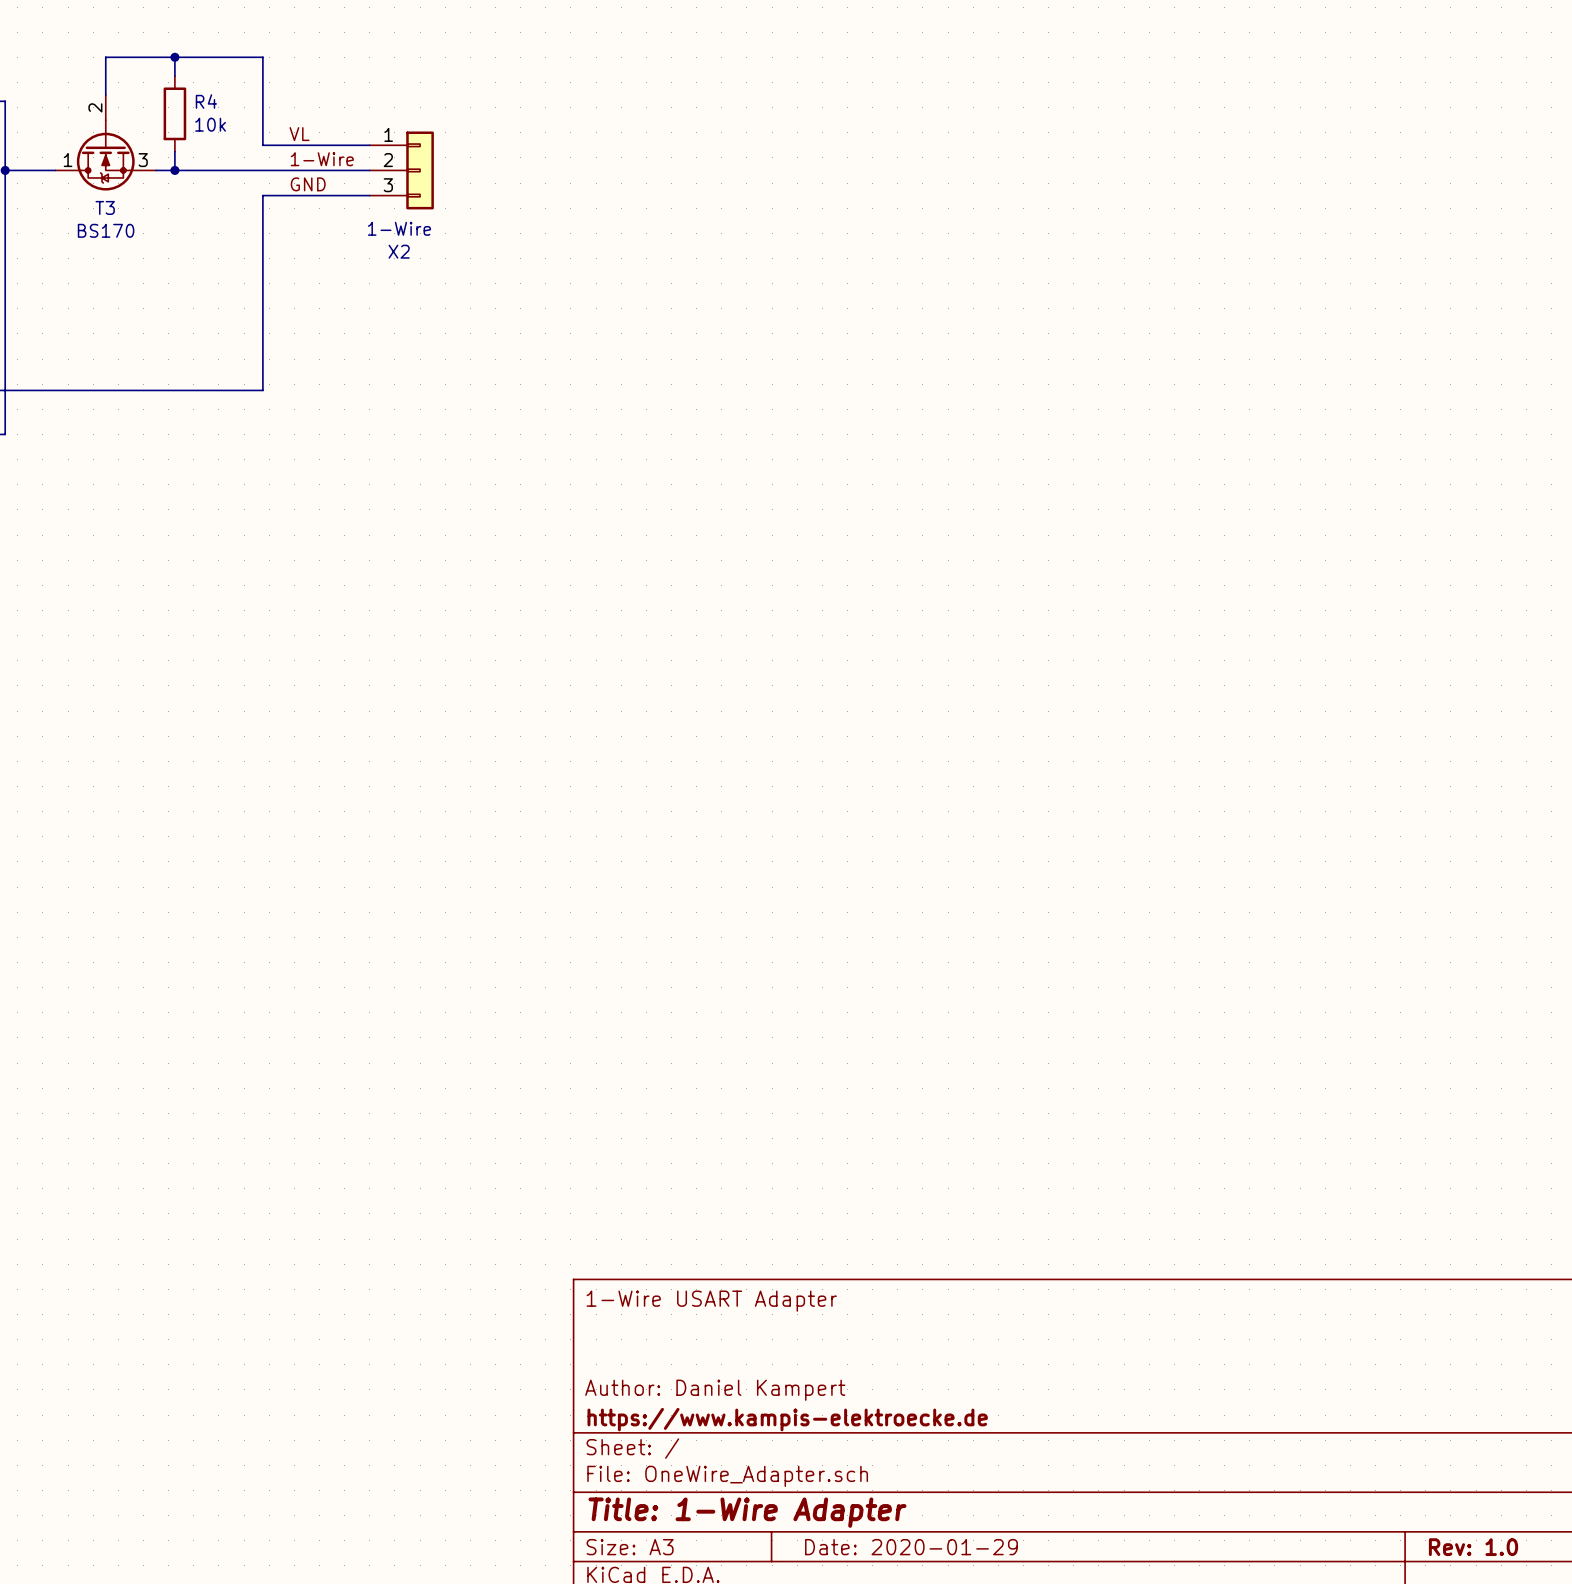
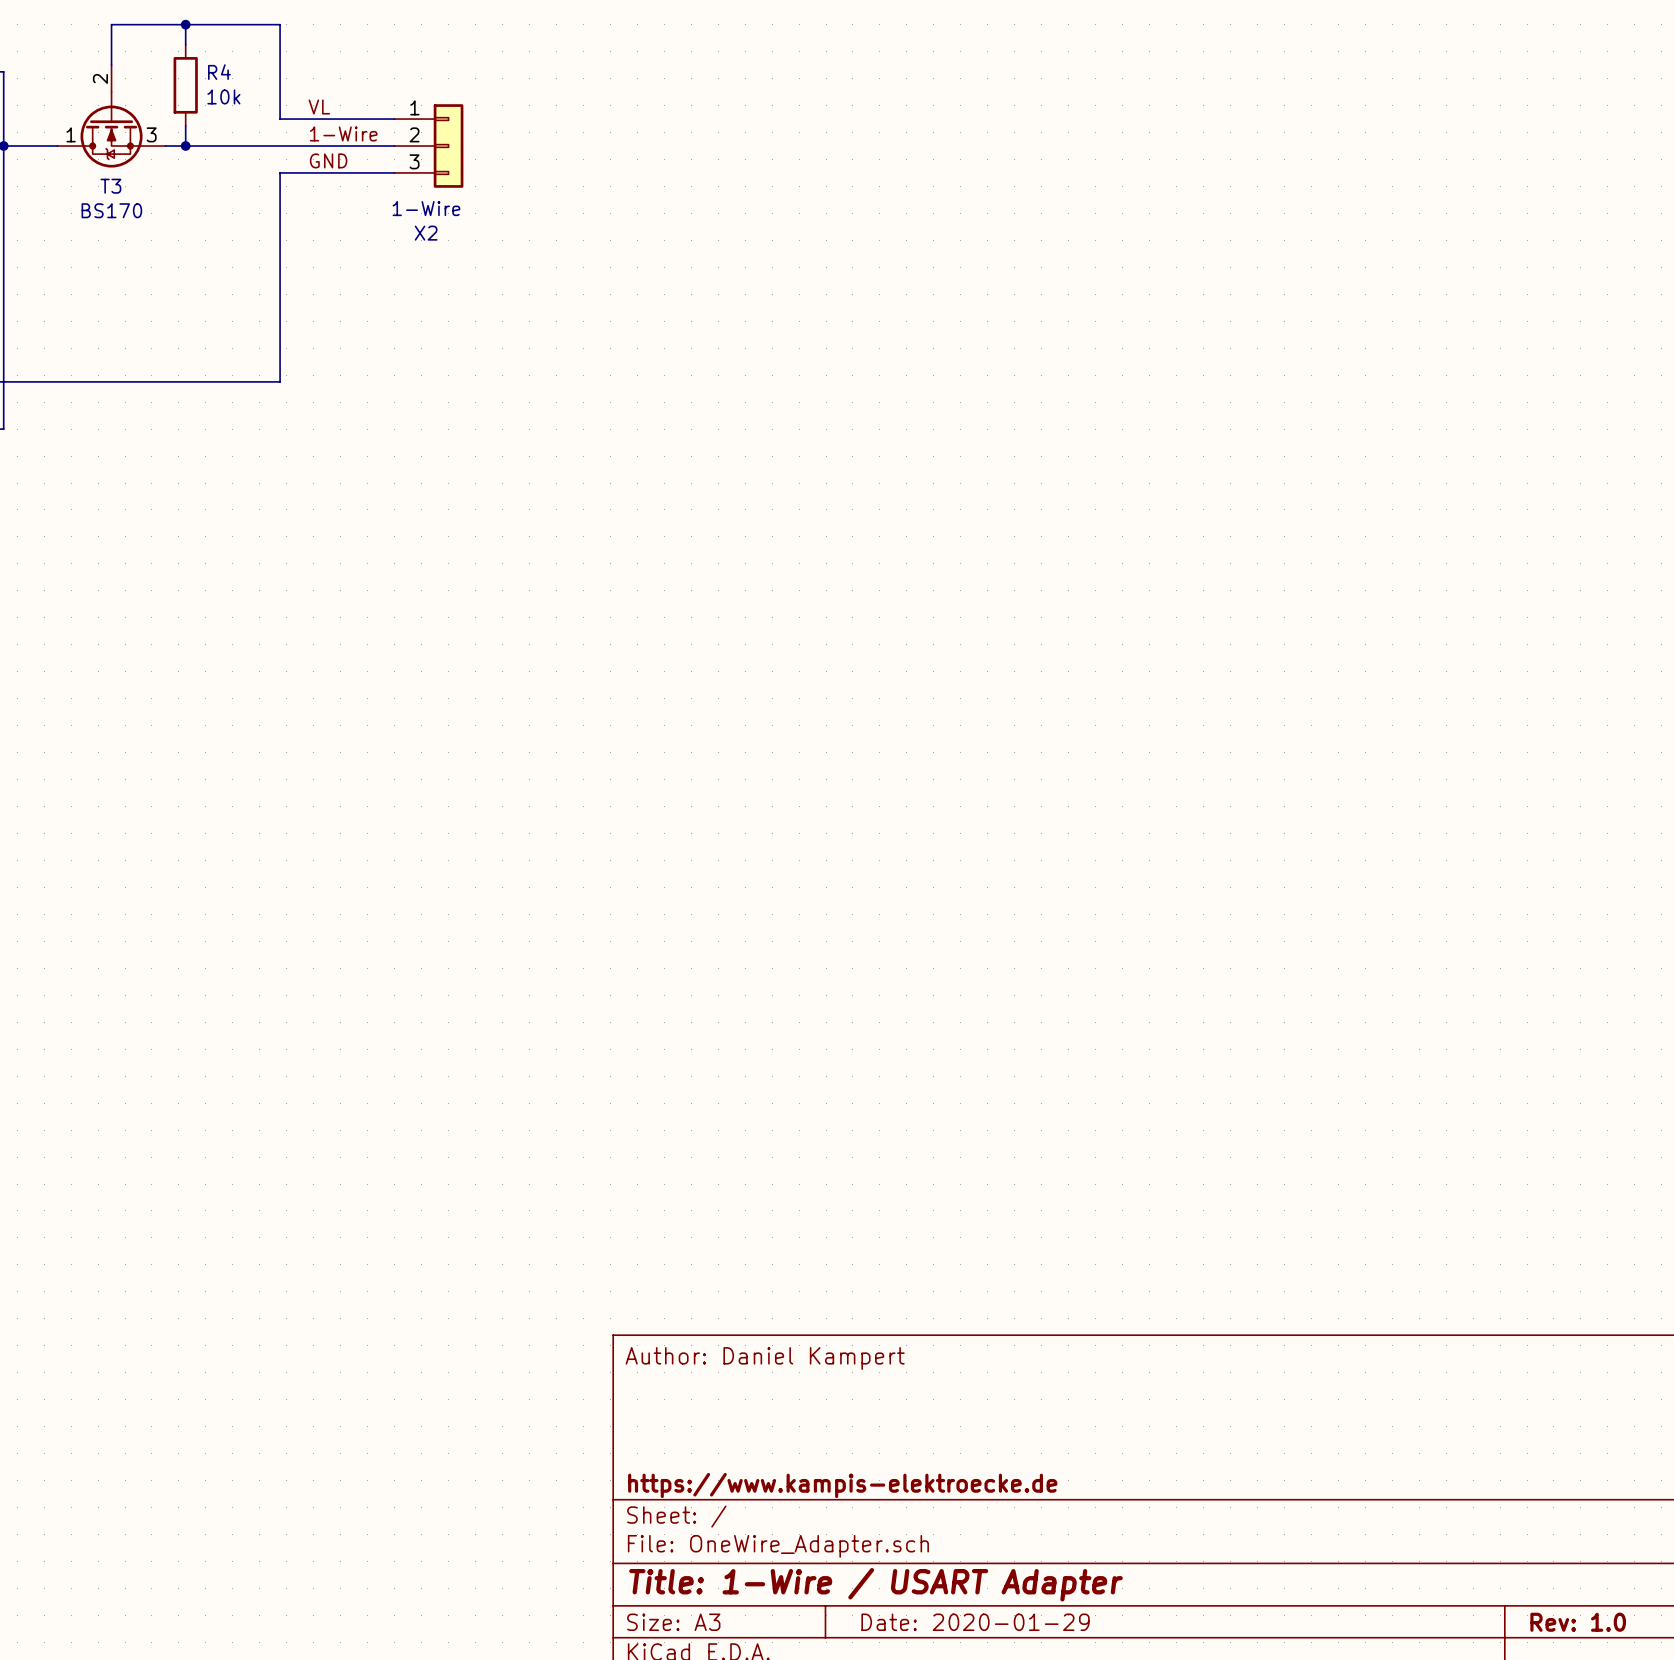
title block: 1-Wire USART Adapter (711, 1301) -> Author: Daniel Kampert (765, 1358)
title block: Author: Daniel Kampert (715, 1390) -> none
title block: Title: 1-Wire Adapter (747, 1512) -> Title: 1-Wire / USART Adapter (875, 1584)

